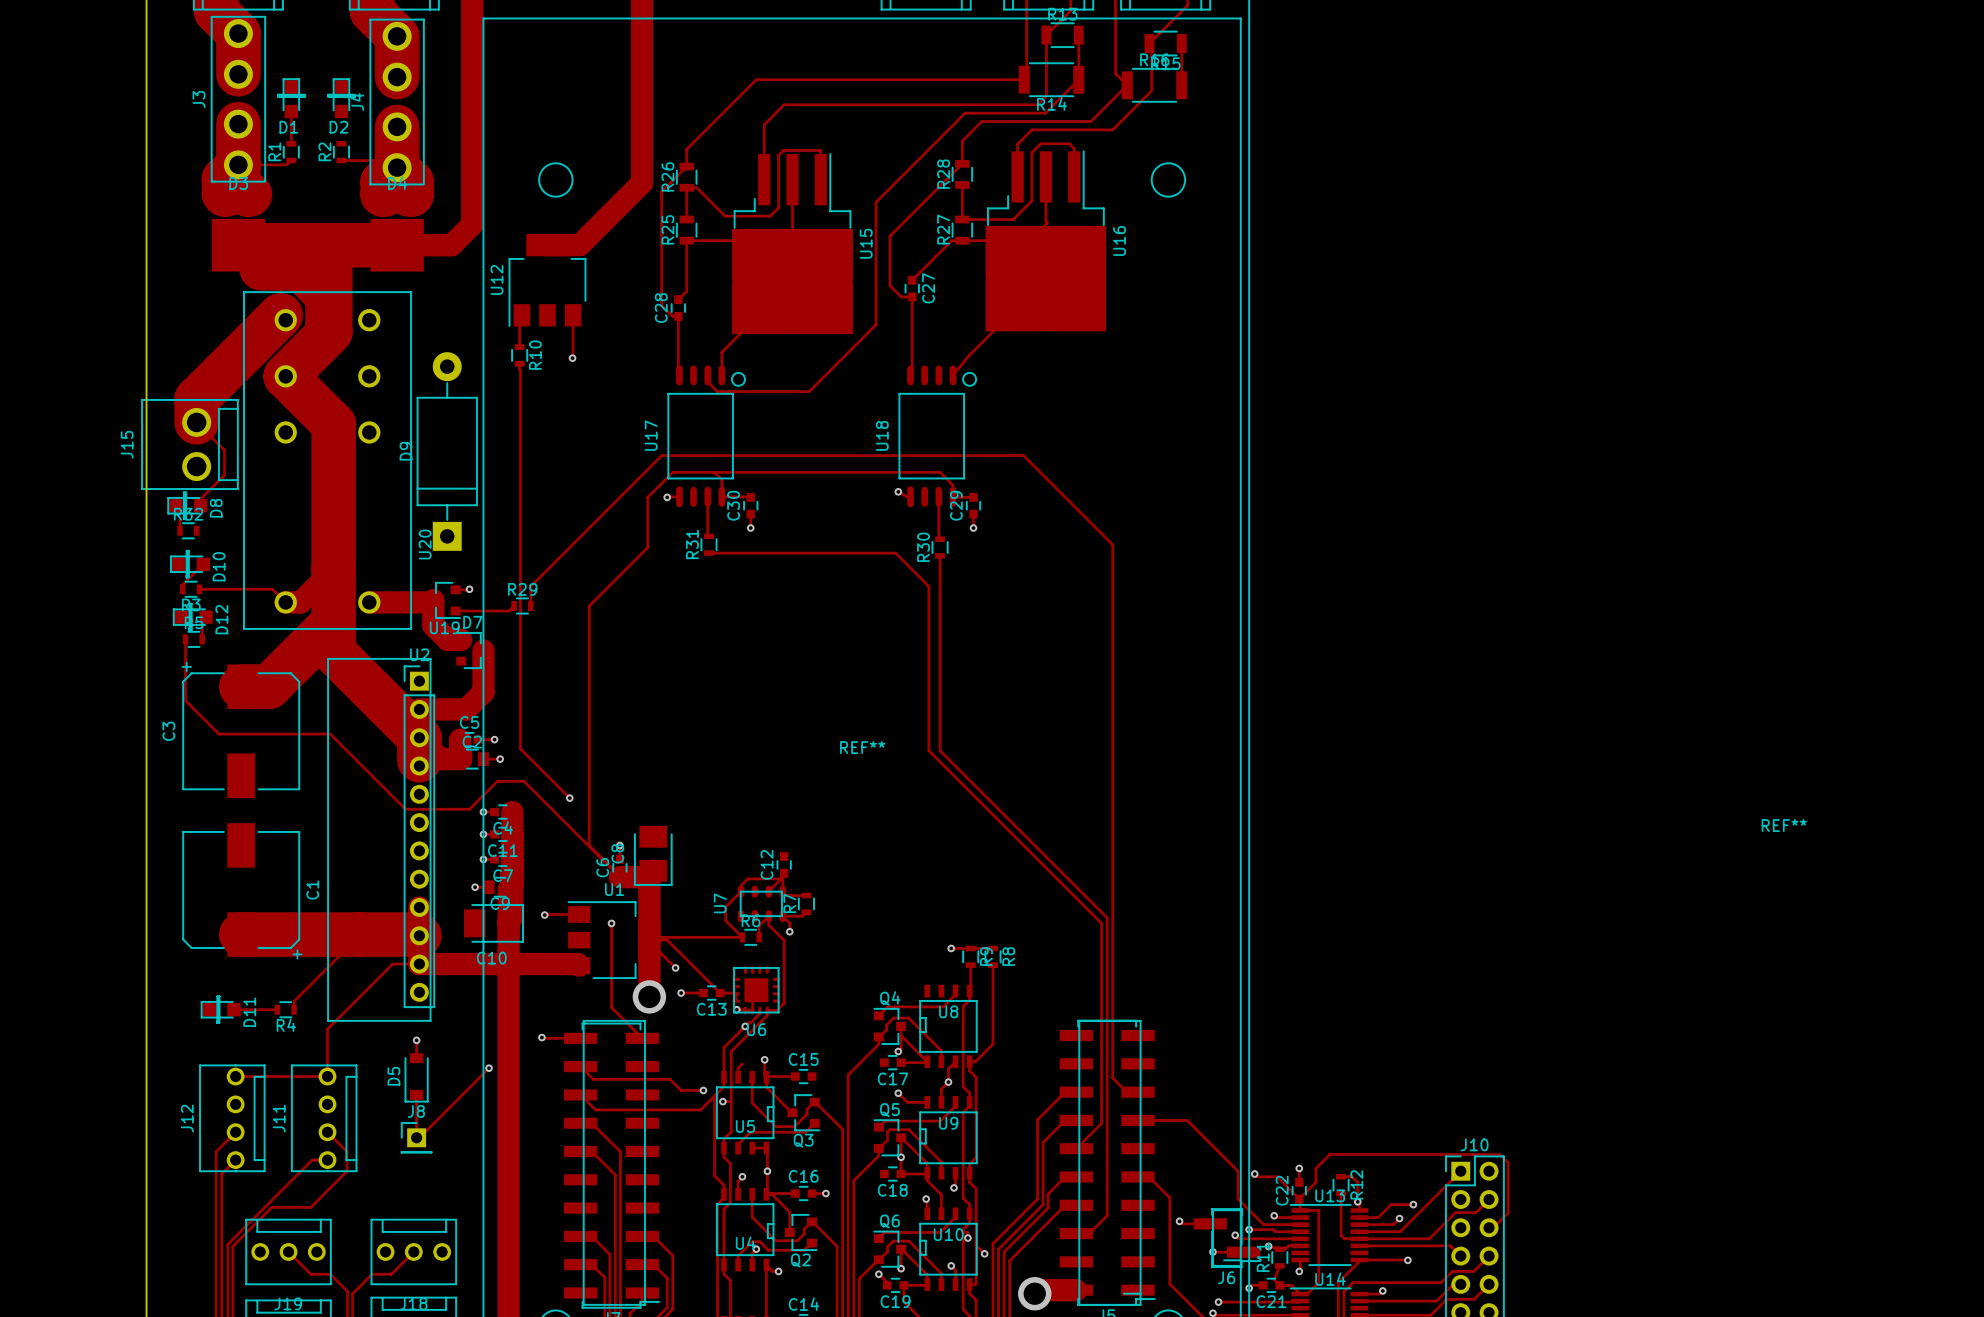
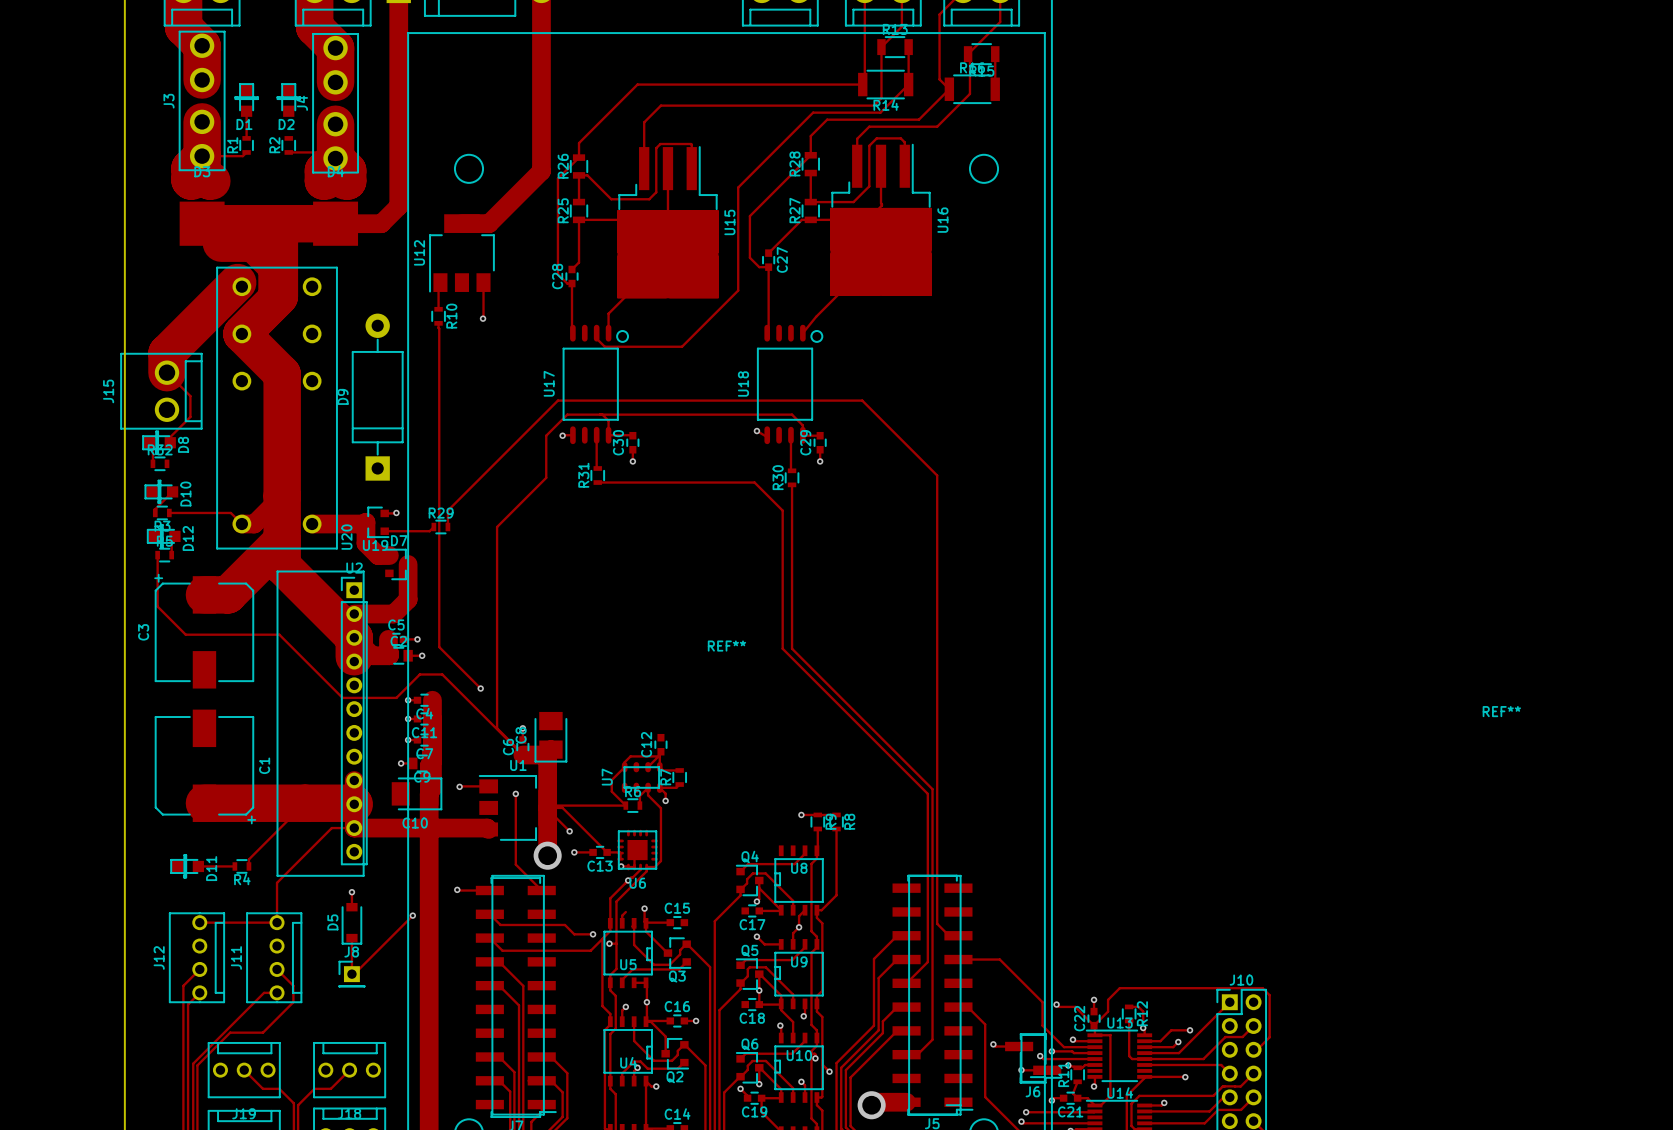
U20 footprint: [243, 291, 412, 630] -> [216, 266, 338, 550]
U20 name position: U20 (425, 544) -> U20 (346, 537)

